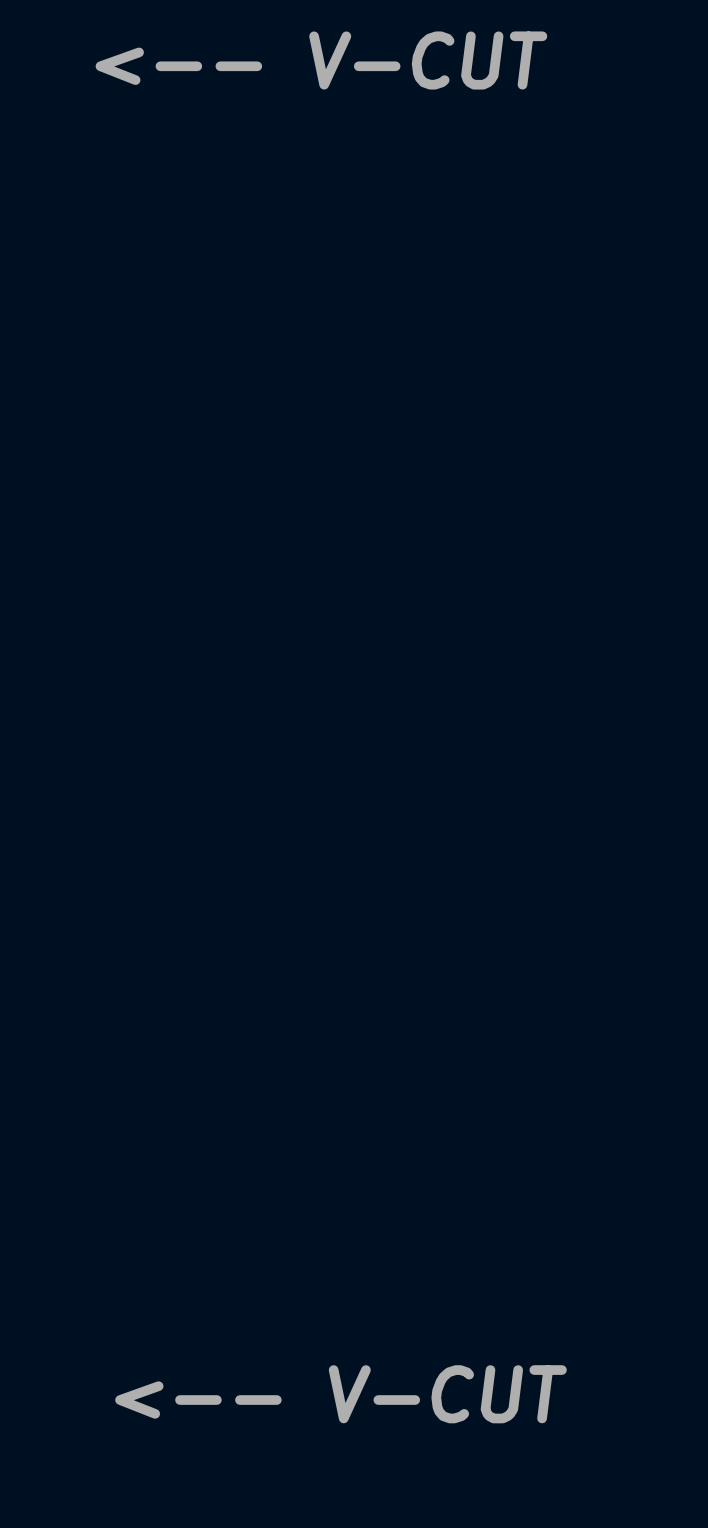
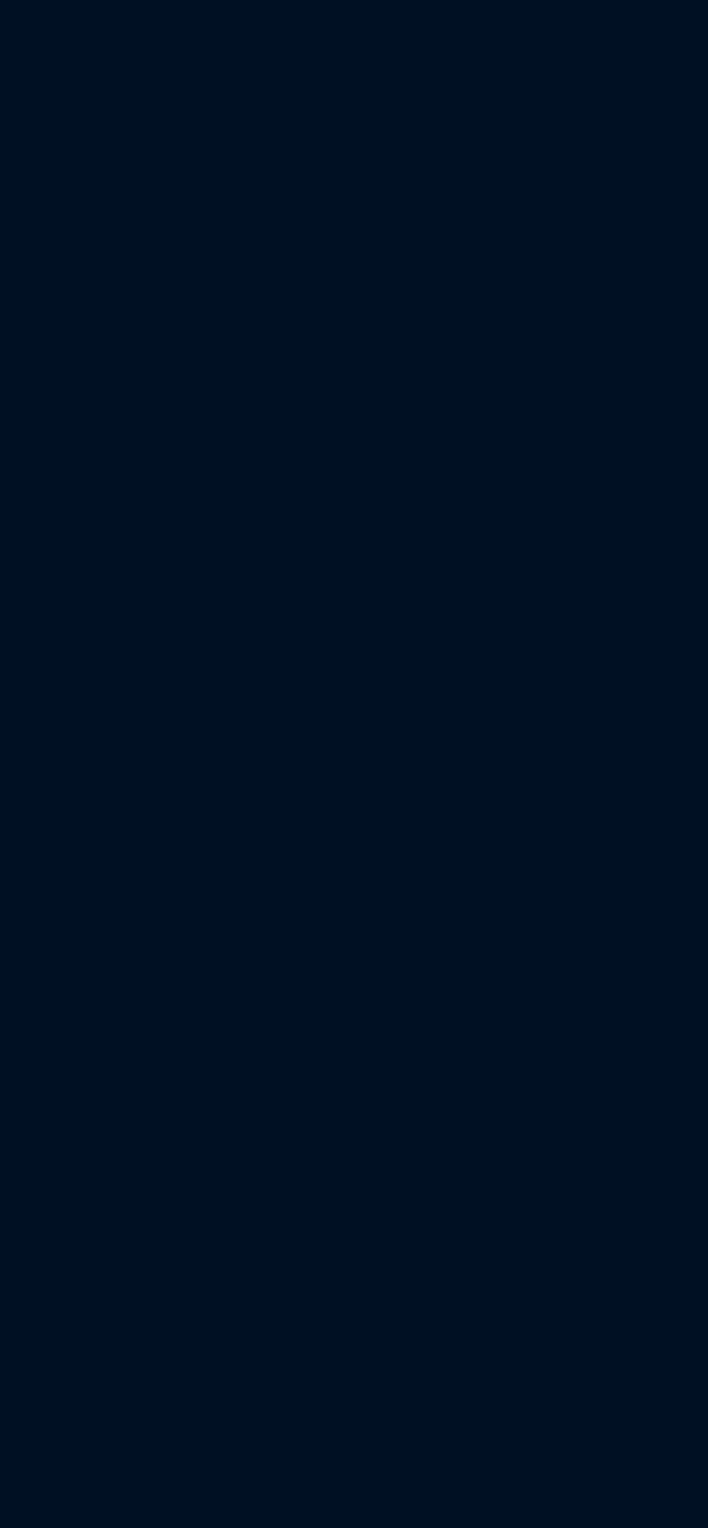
text: <-- V-CUT (321, 60) -> none
text: <-- V-CUT (341, 1394) -> none

